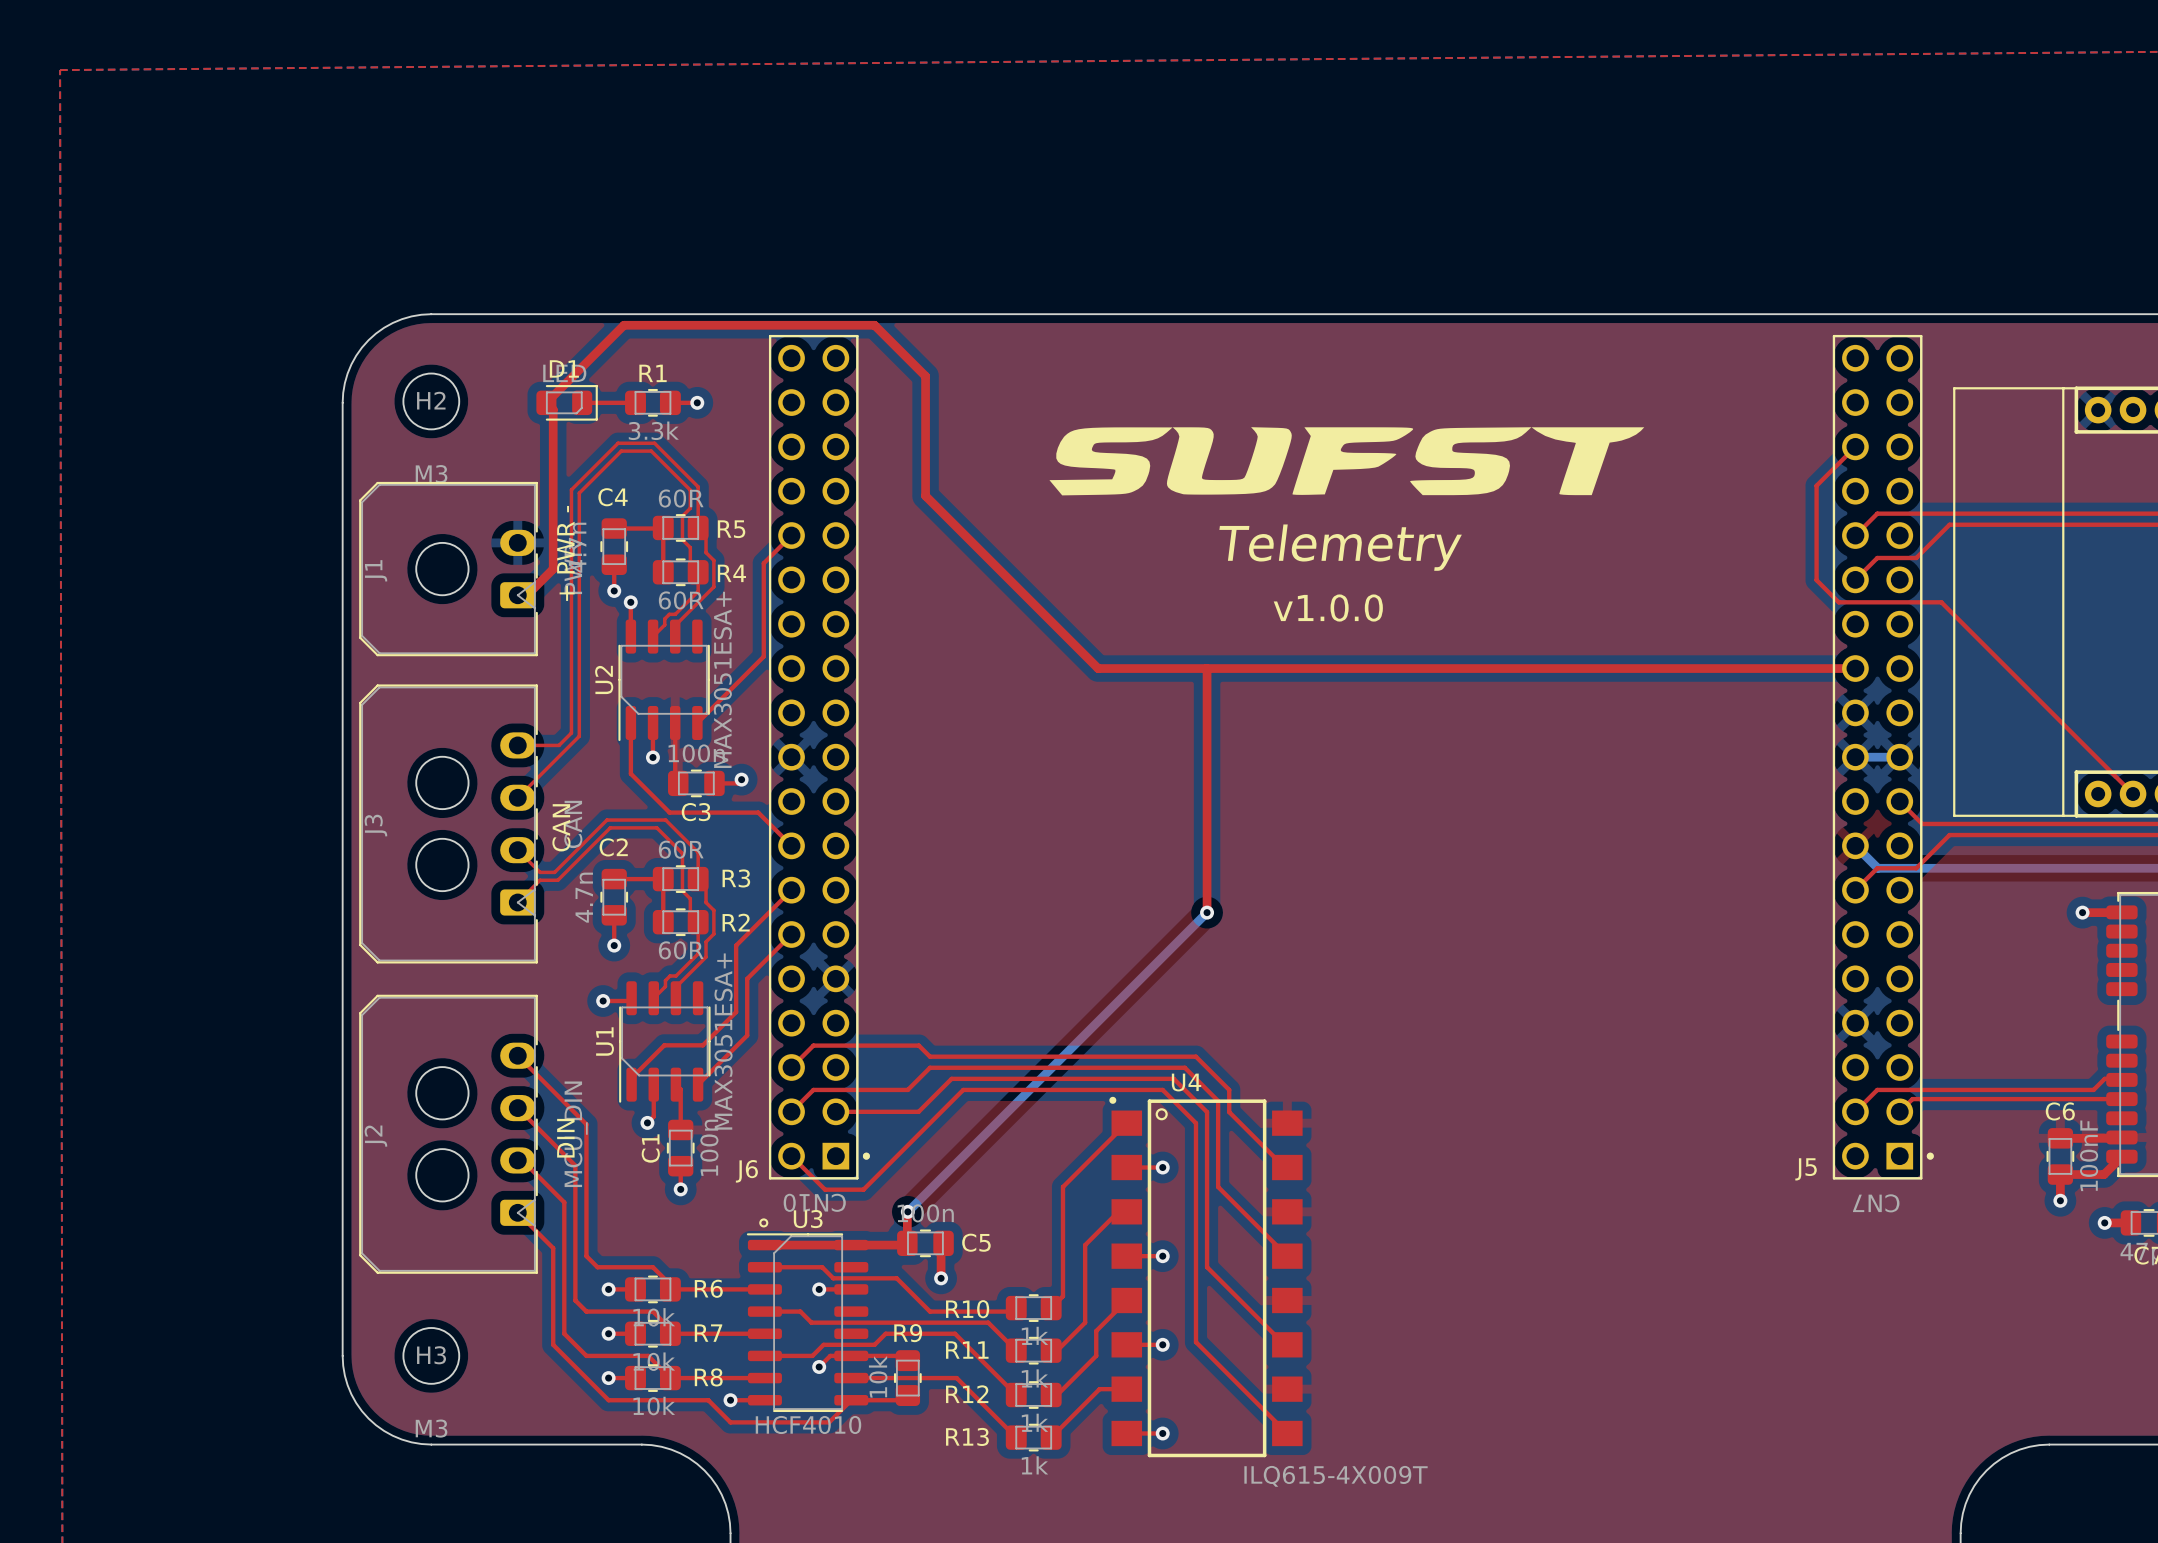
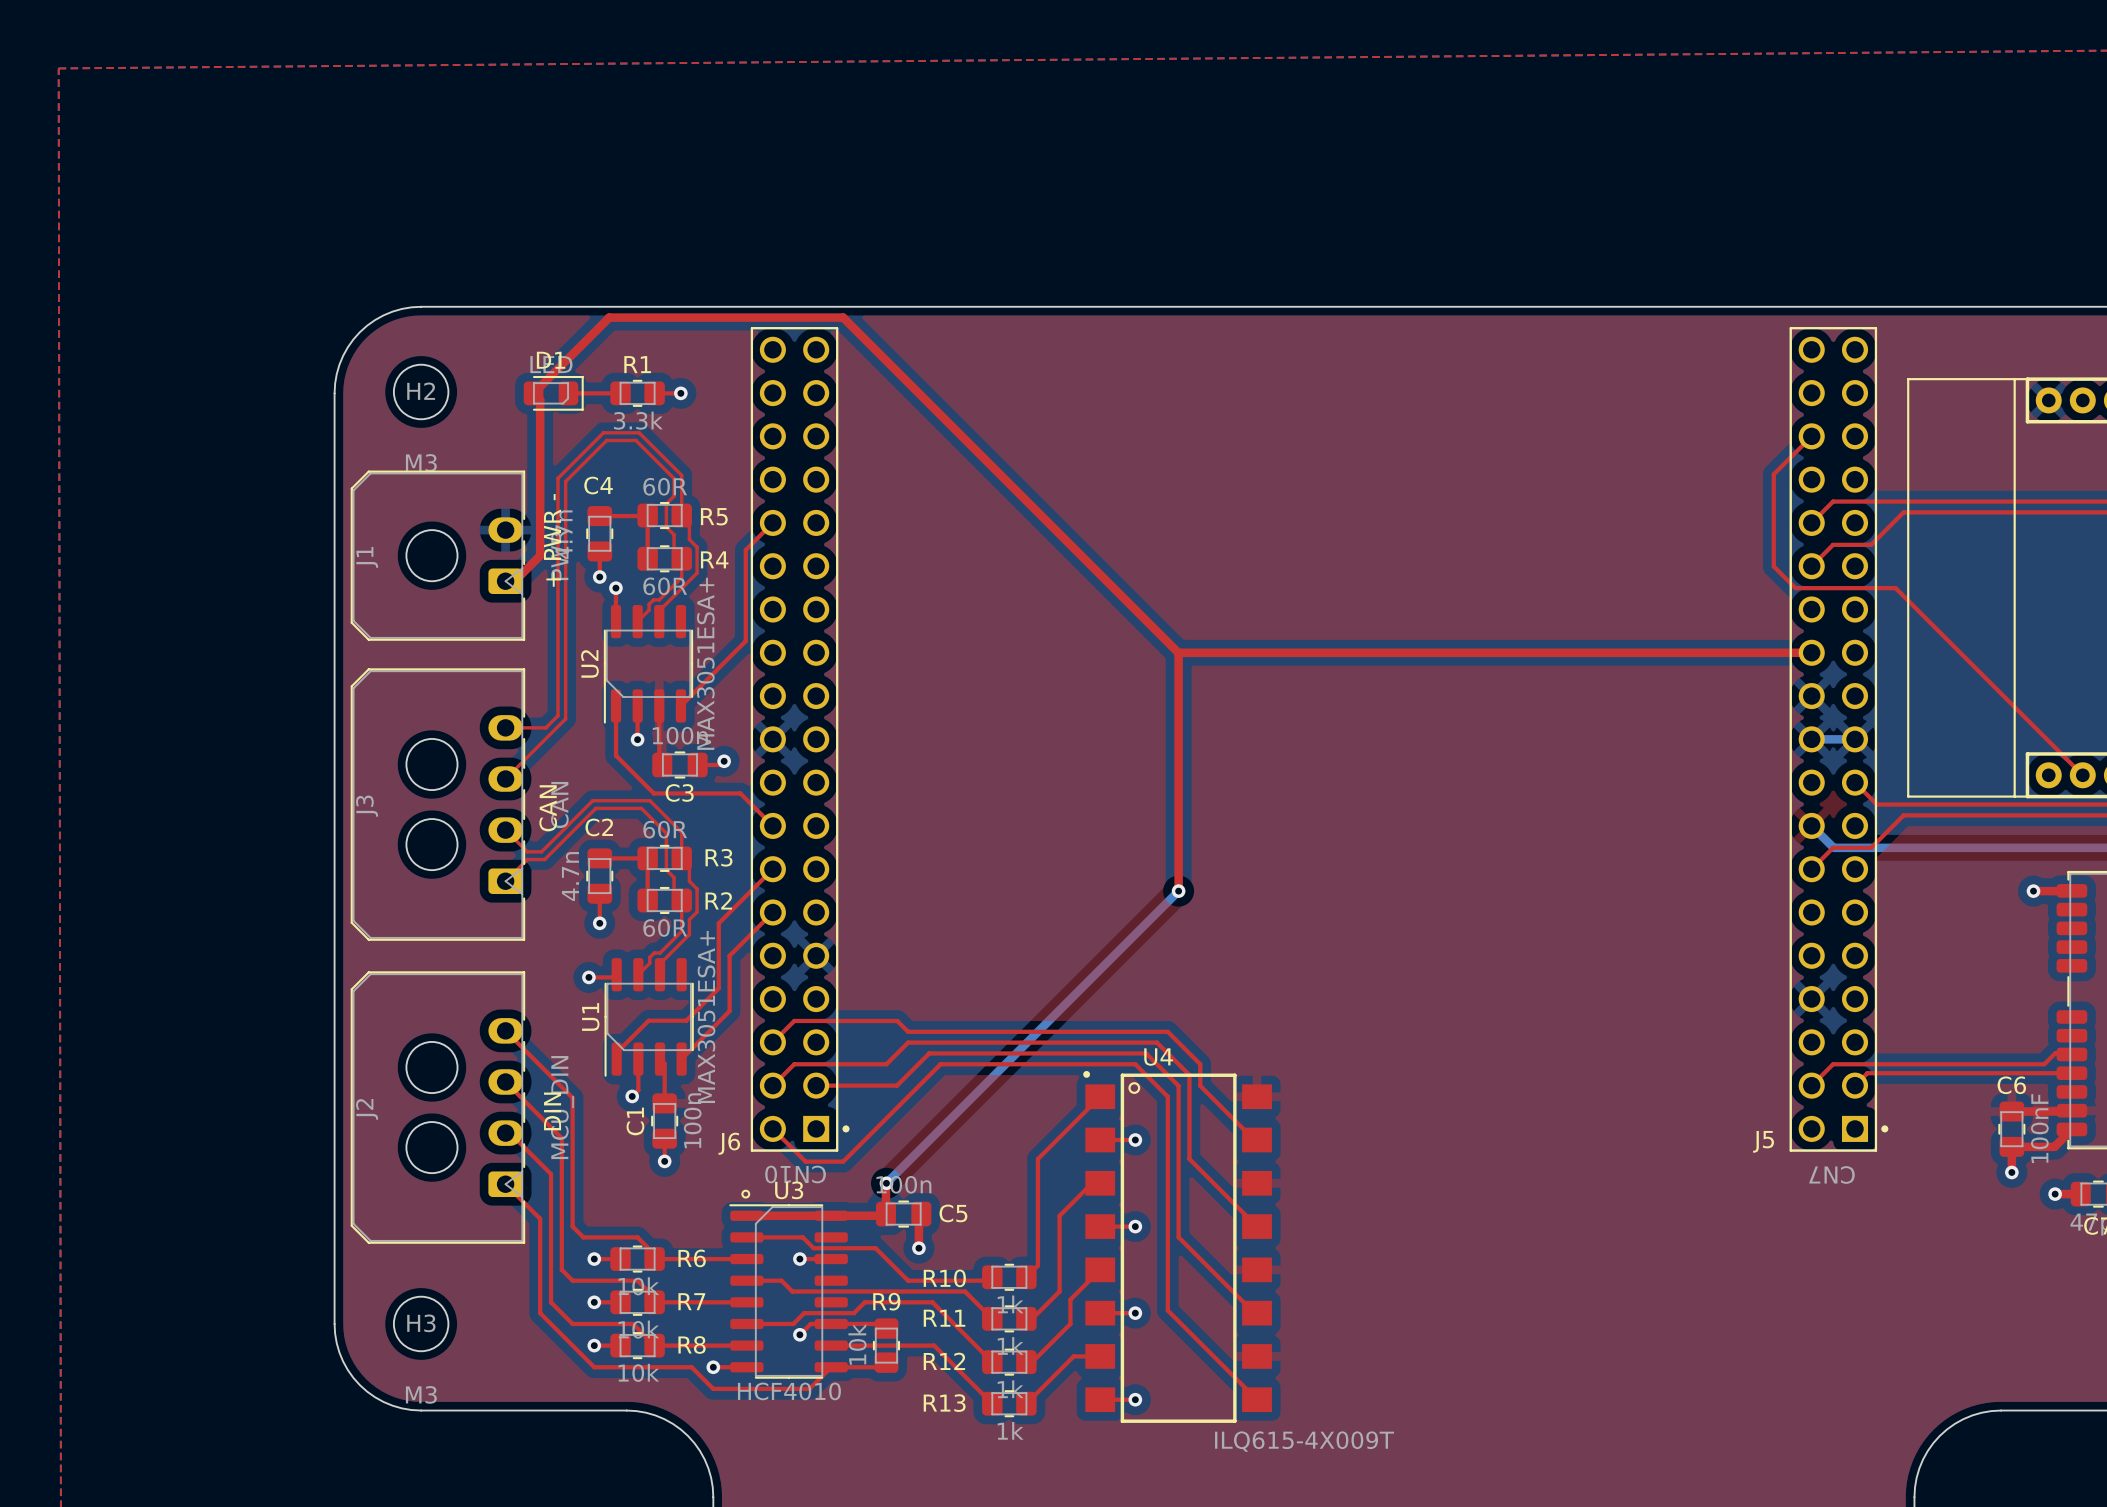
top track: (863, 325) (874, 325) (925, 376) (925, 495) (1098, 668) (1206, 668) -> (843, 317) (1178, 652)
drawing: [1049, 427, 1645, 496] -> none
text: Telemetry (1340, 547) -> none
text: v1.0.0 (1328, 608) -> none

